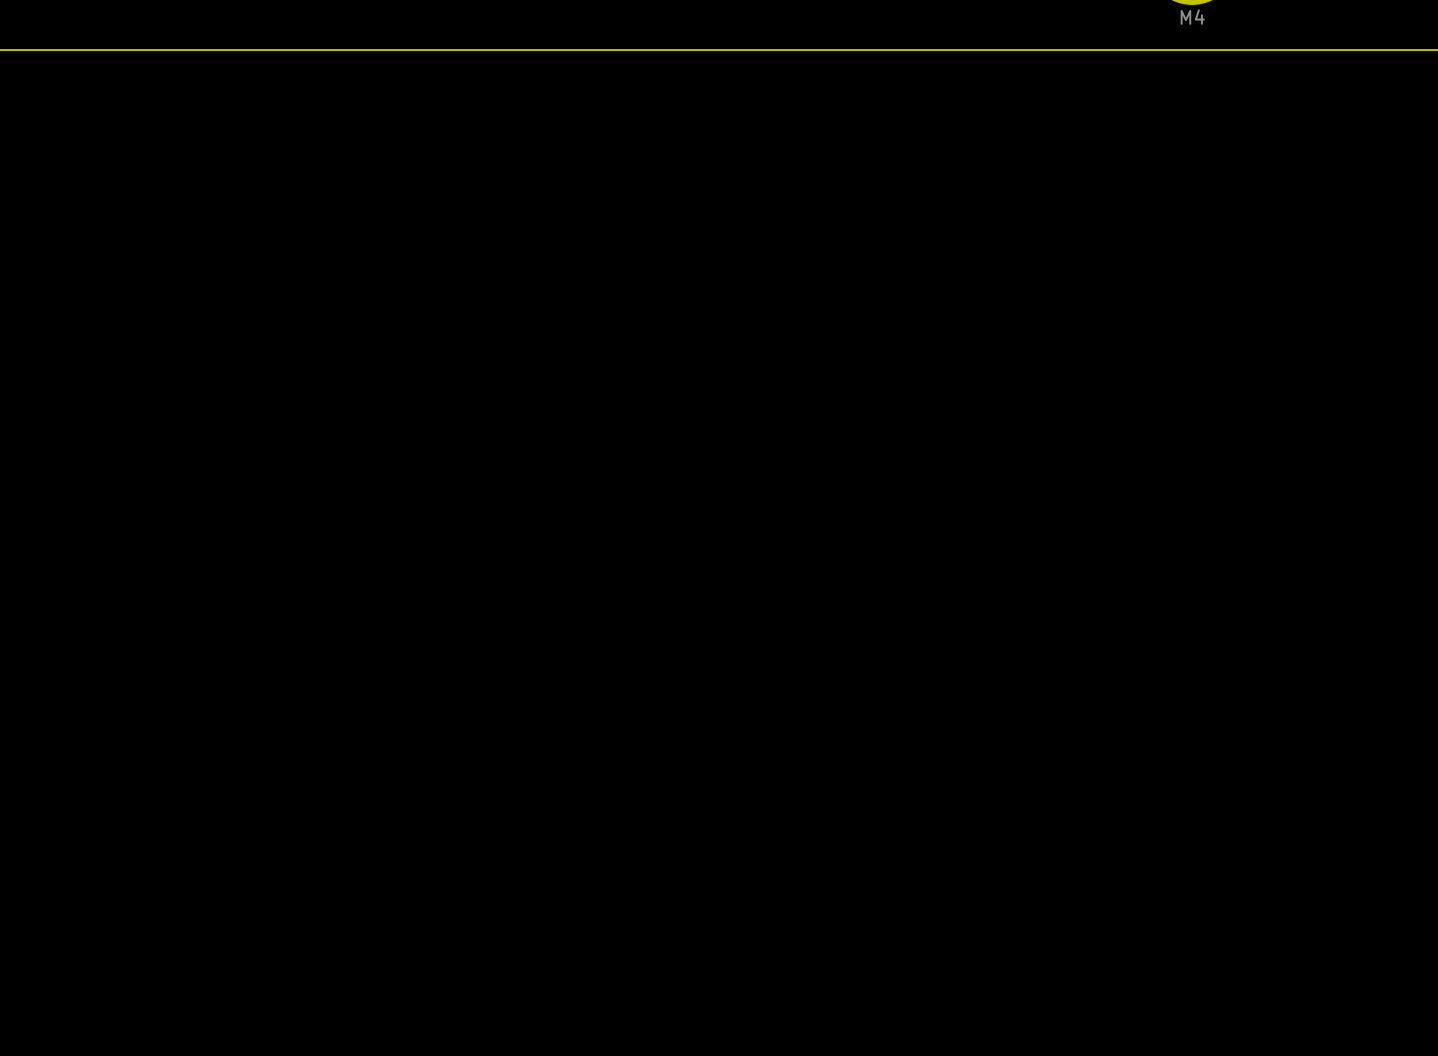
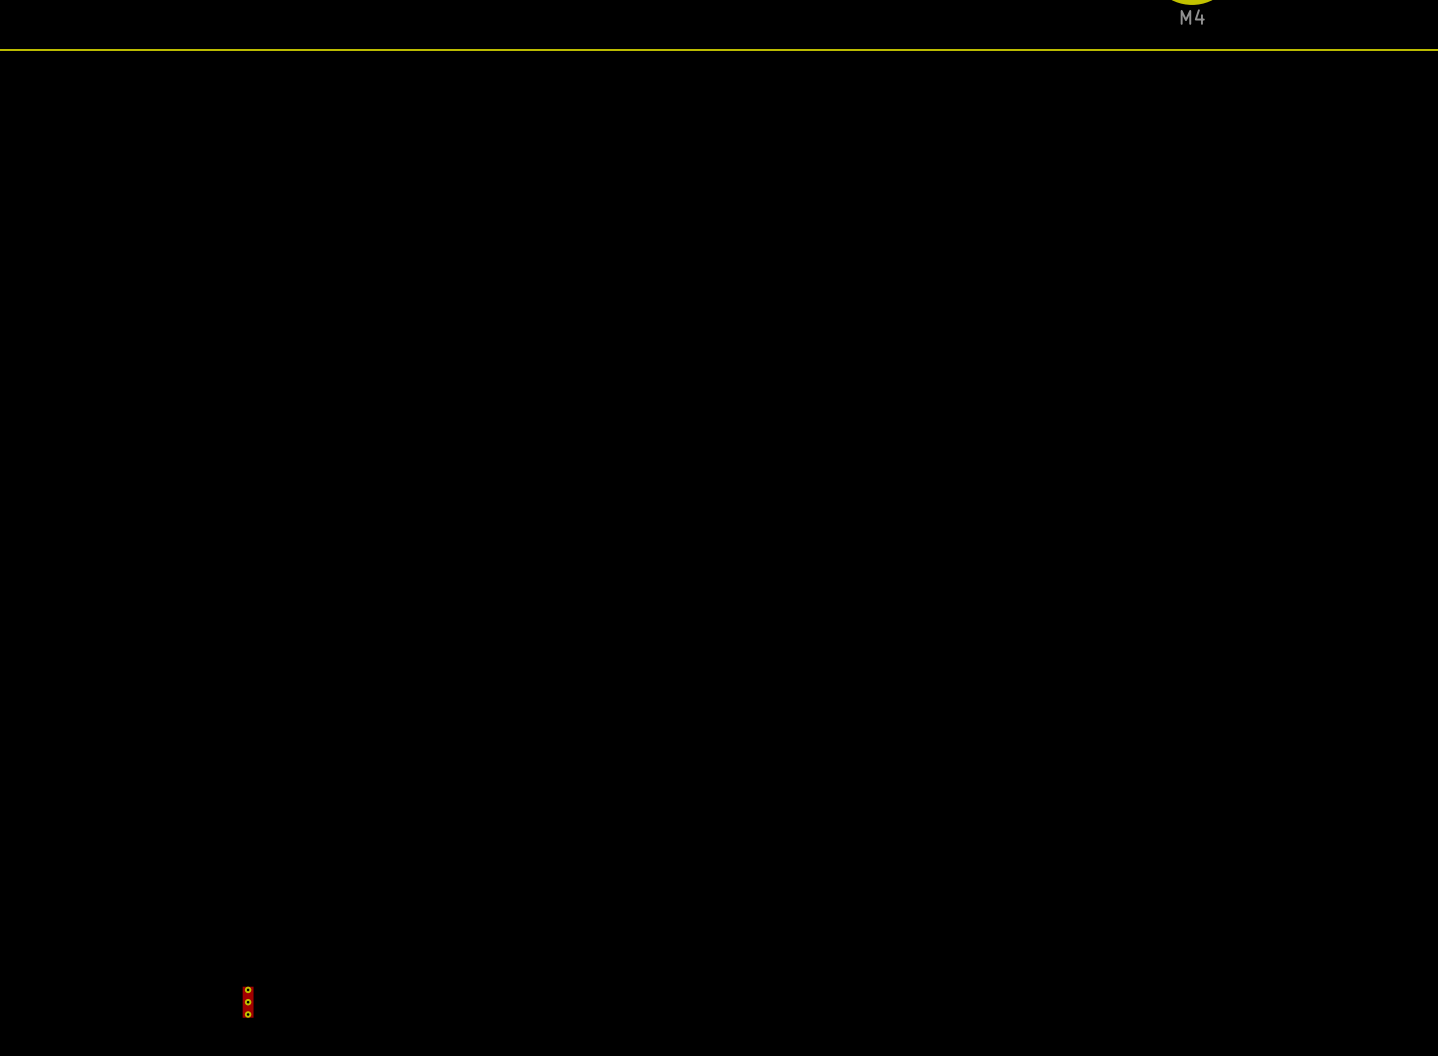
part: none -> (248, 1002)

